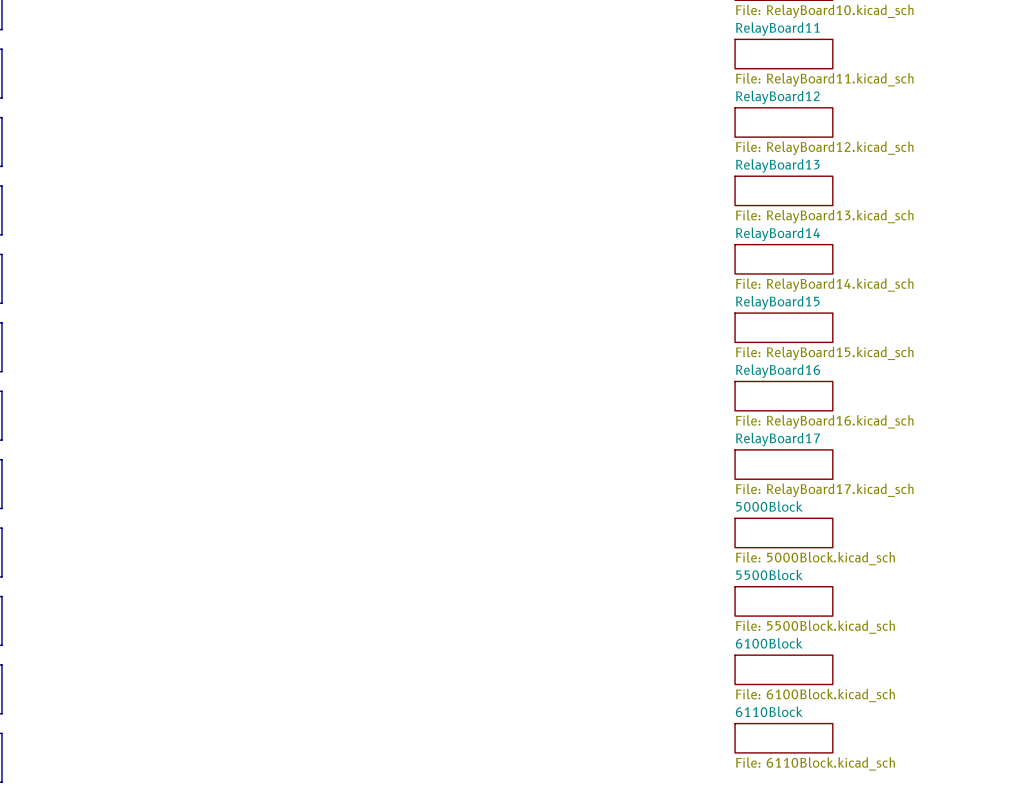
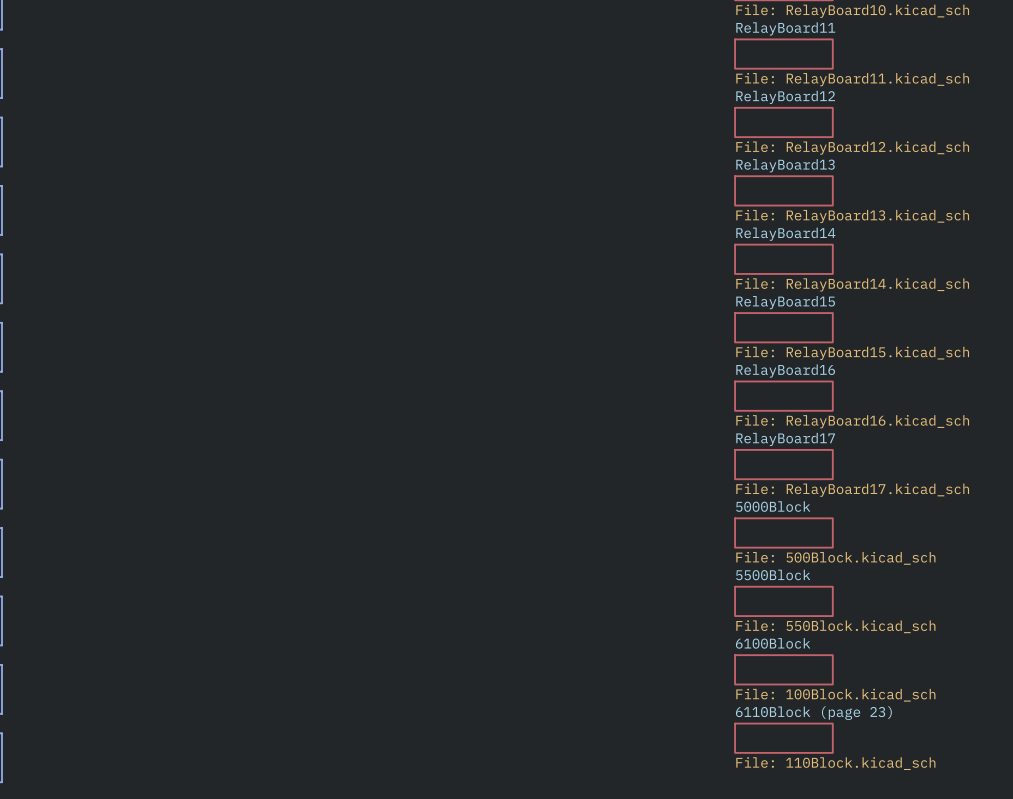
sheet 5000Block value: File: 5000Block.kicad_sch (815, 558) -> File: 500Block.kicad_sch (835, 558)
sheet 5500Block value: File: 5500Block.kicad_sch (815, 627) -> File: 550Block.kicad_sch (835, 626)
sheet 6100Block value: File: 6100Block.kicad_sch (815, 695) -> File: 100Block.kicad_sch (835, 695)
sheet 6110Block name: 6110Block (769, 711) -> 6110Block (page 23) (813, 713)
sheet 6110Block value: File: 6110Block.kicad_sch (815, 763) -> File: 110Block.kicad_sch (835, 763)

